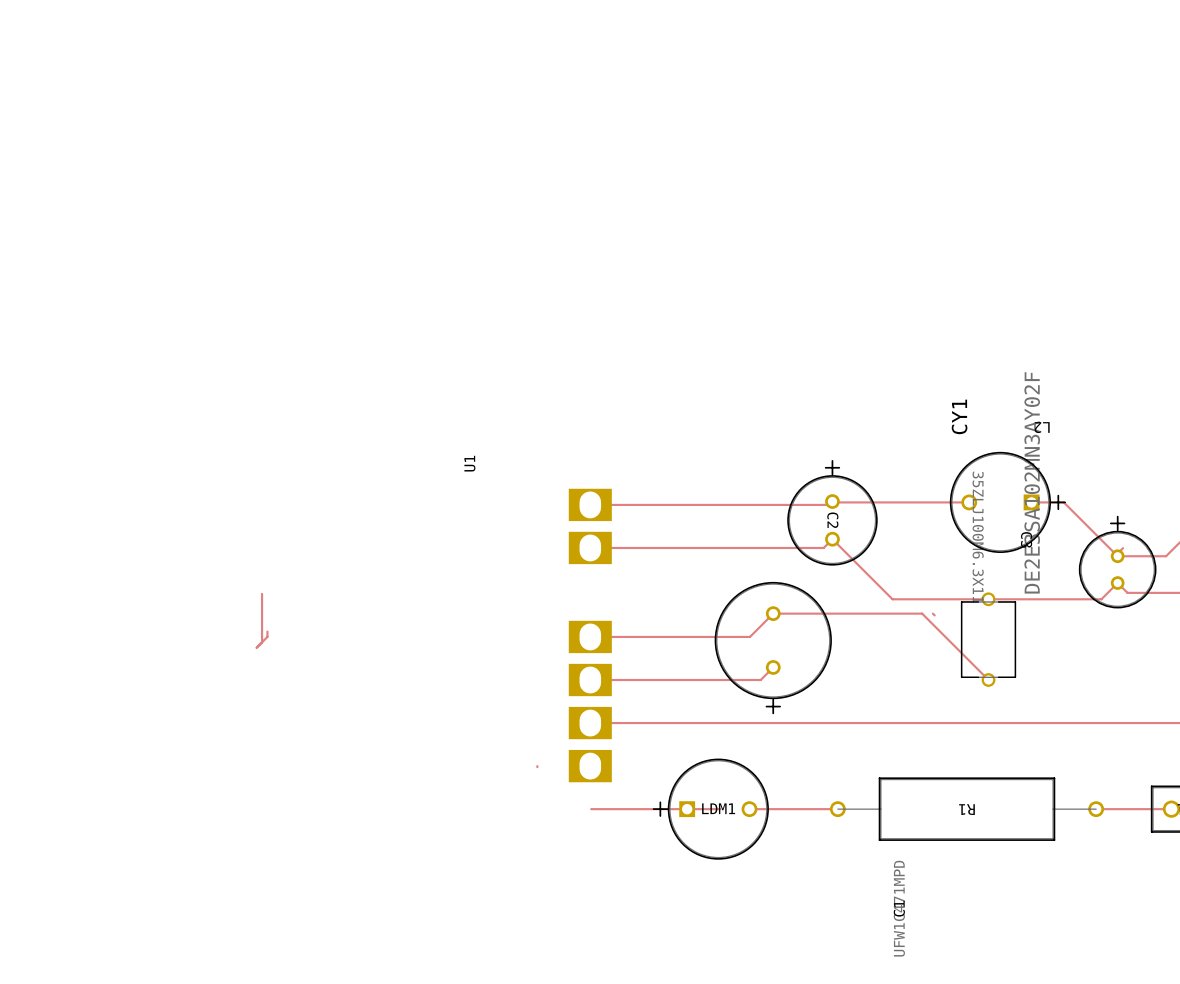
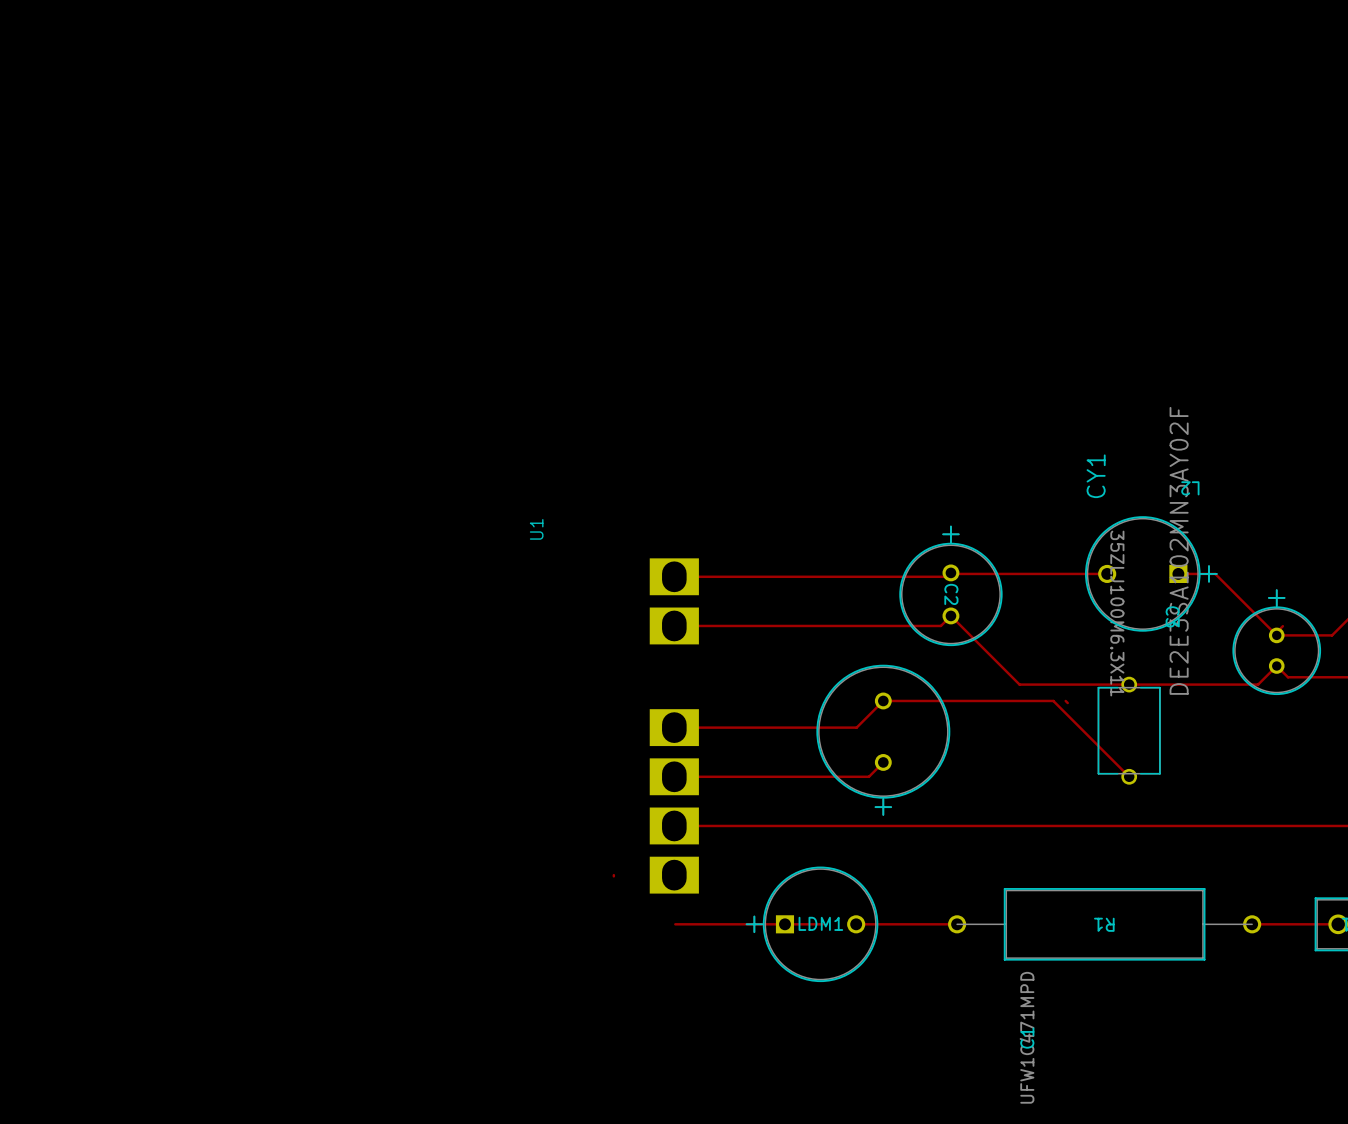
top track: (262, 593) (262, 642) -> none
top track: (267, 631) (267, 636) (256, 647) -> none

